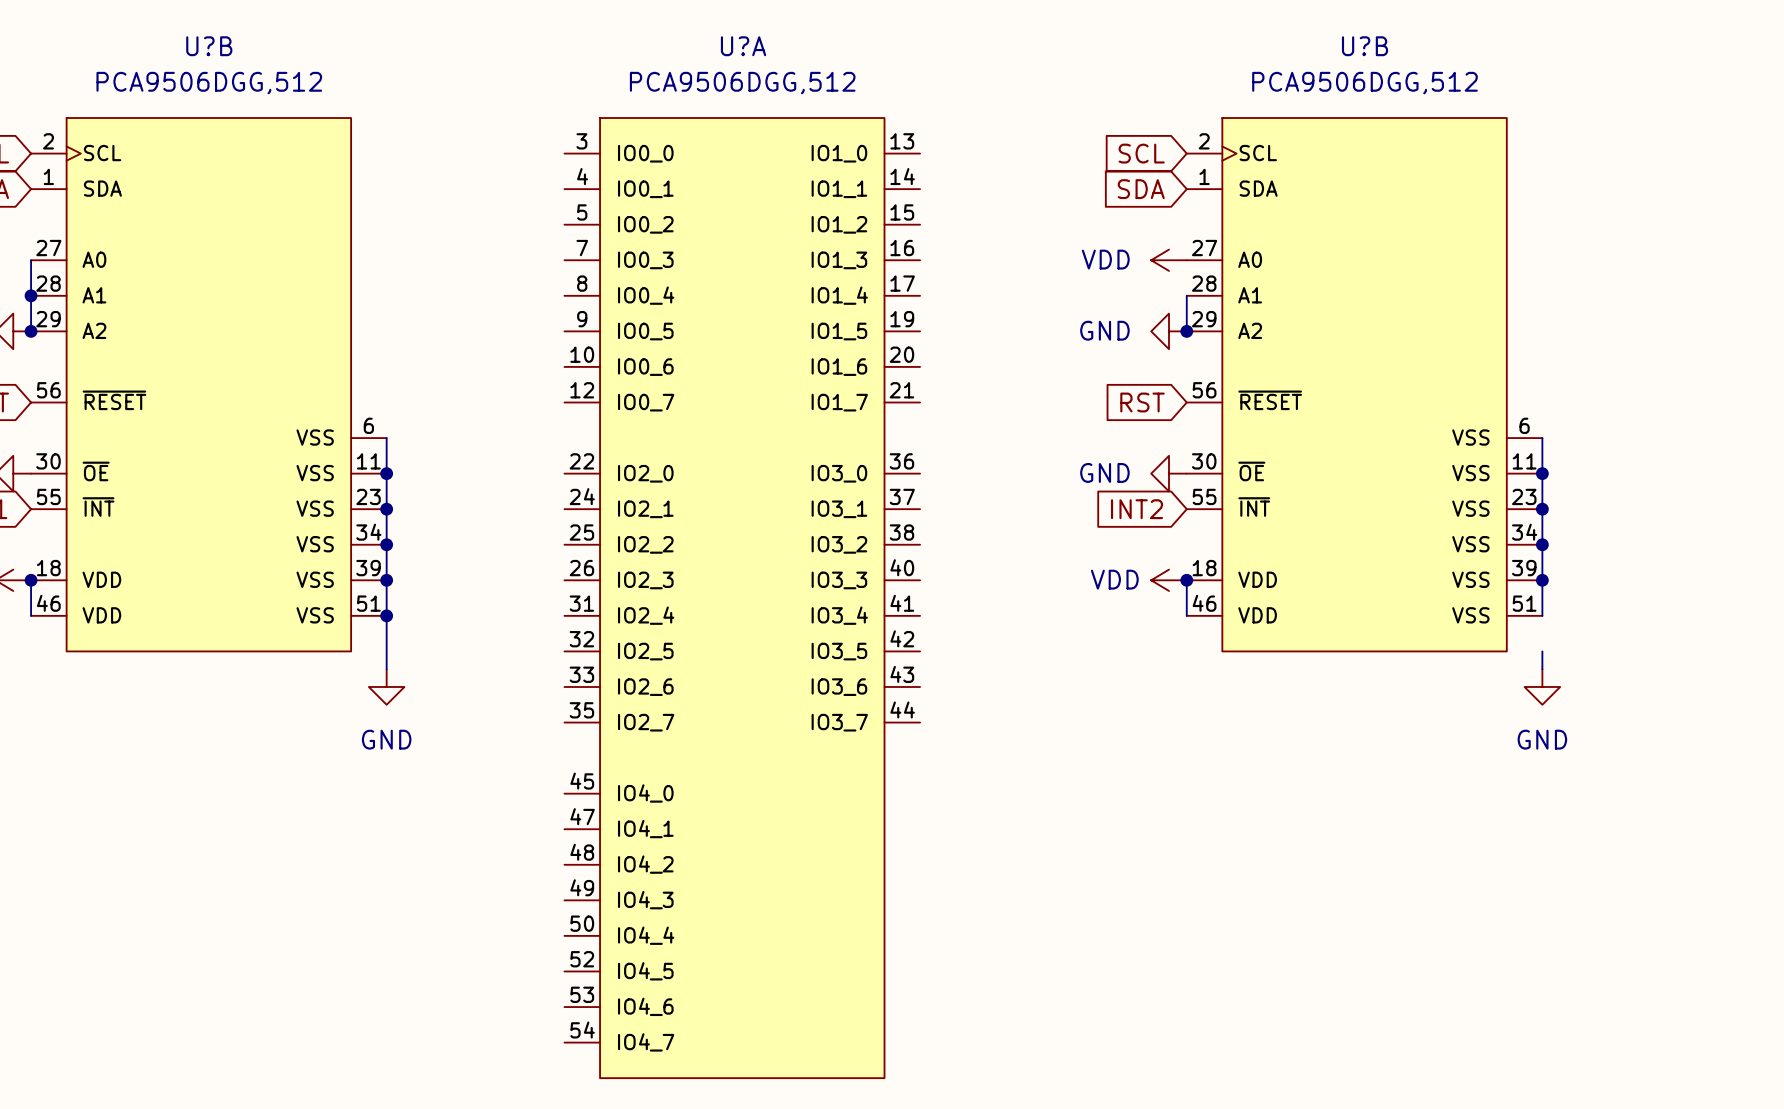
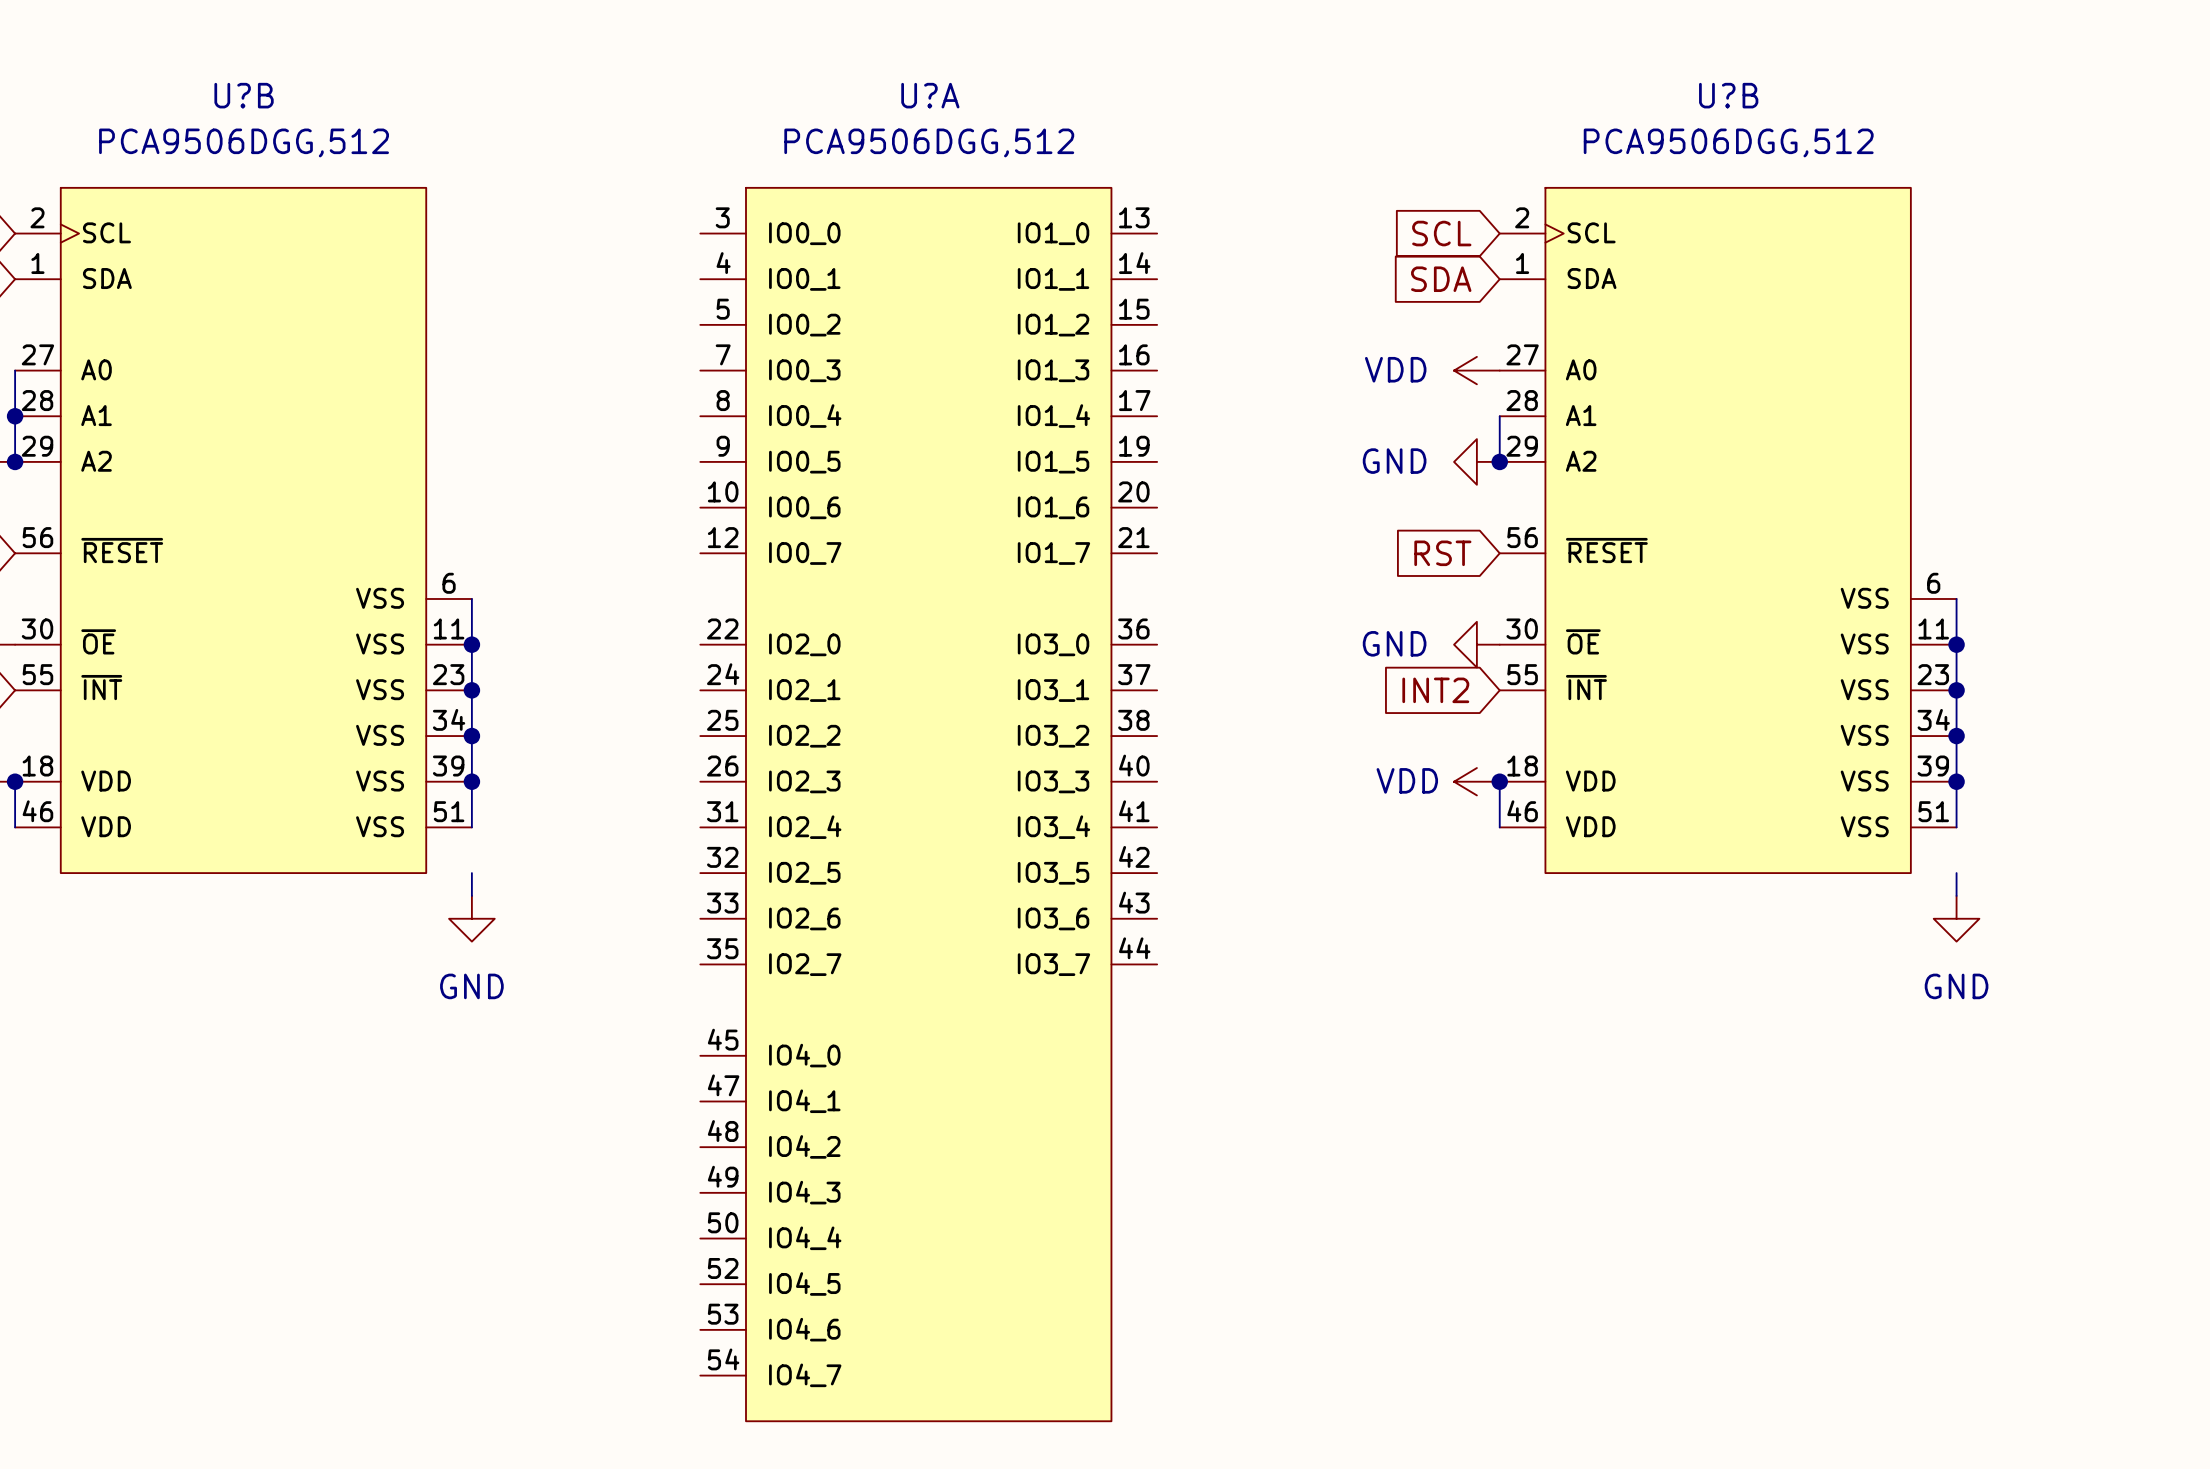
wire: (386, 615) (386, 651) -> none
junction: (386, 615) -> none

